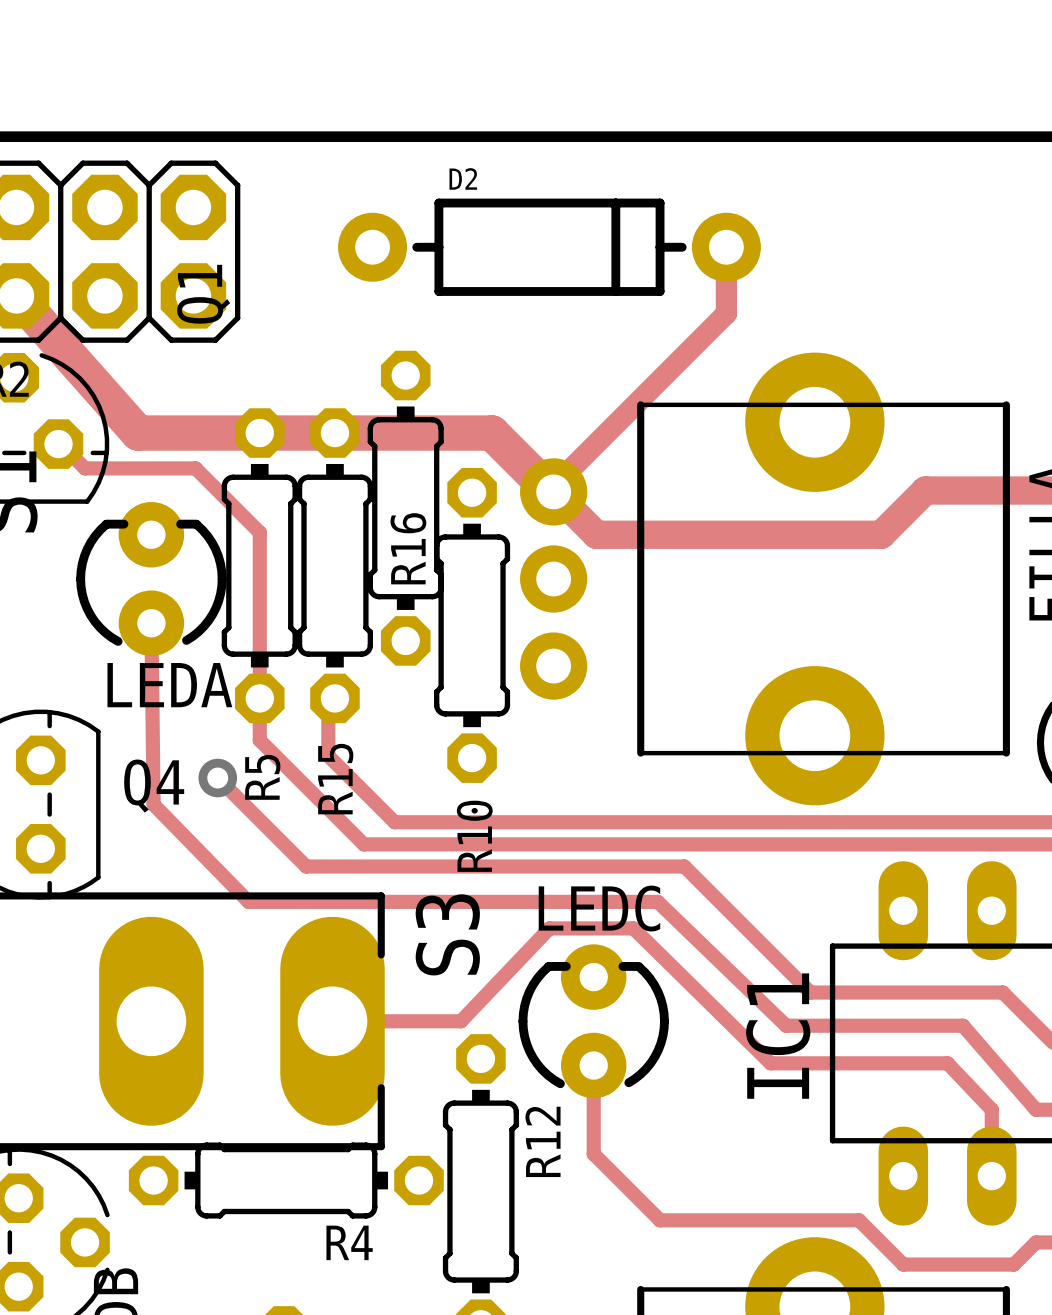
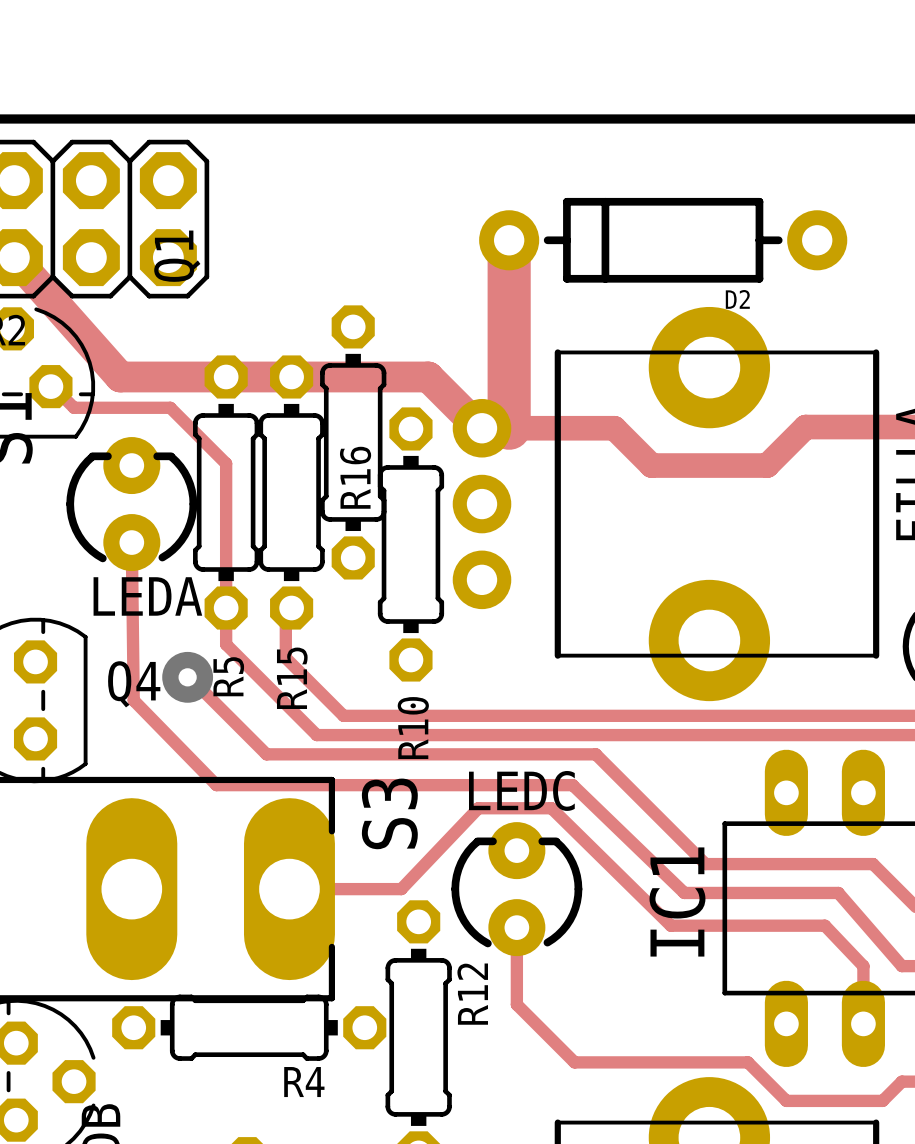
D2 rotation: 0° (549, 247) -> 180° (663, 240)
track: (726, 247) (726, 313) (553, 486) (553, 491) (596, 534) (748, 534) -> (482, 428) (614, 428) (651, 465)
track: none -> (509, 240) (509, 428)
via size: [198, 758, 238, 798] -> [162, 651, 214, 703]

